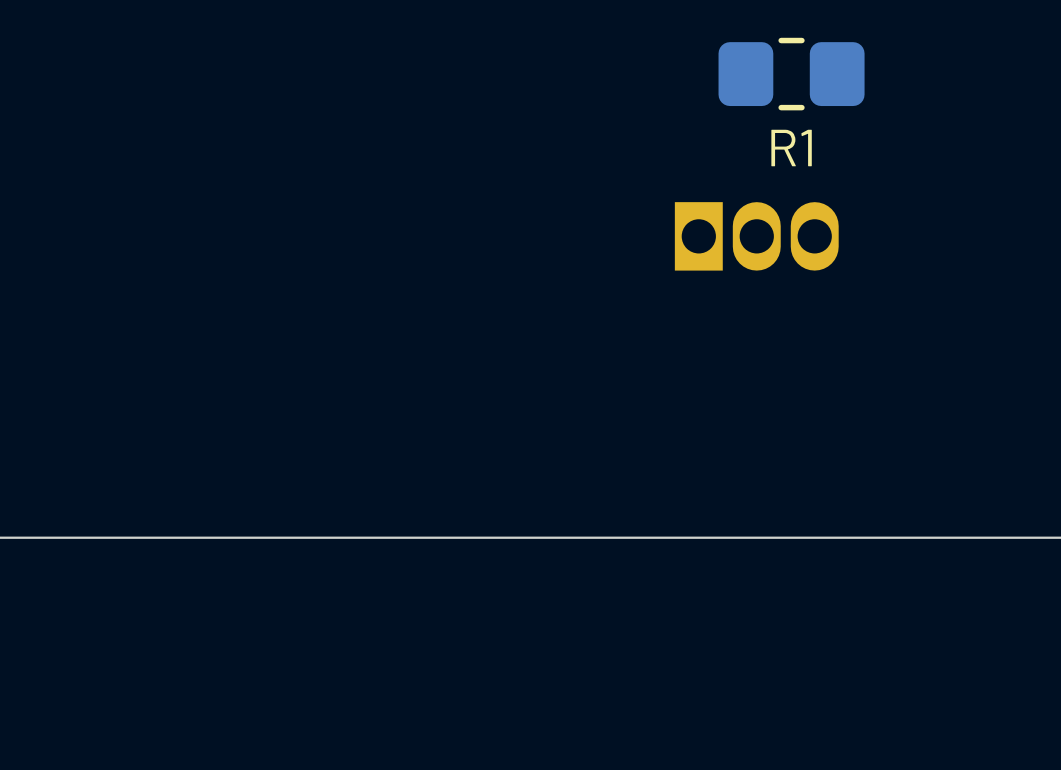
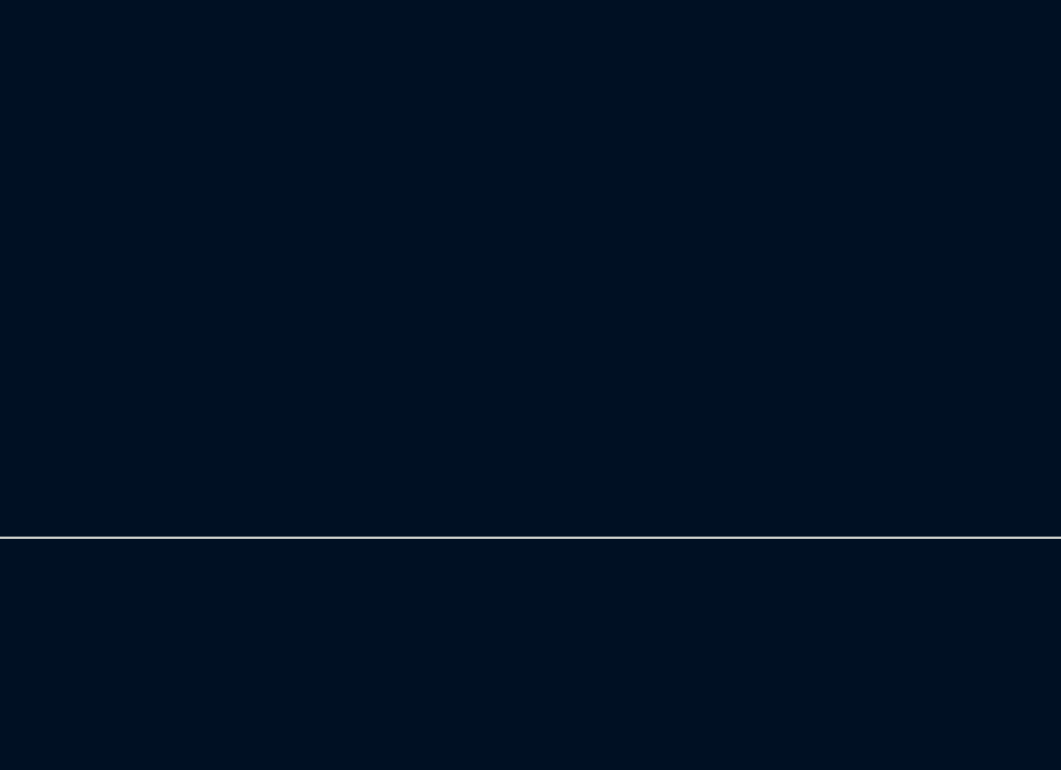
R1: (791, 74) -> none
part: (756, 236) -> none

